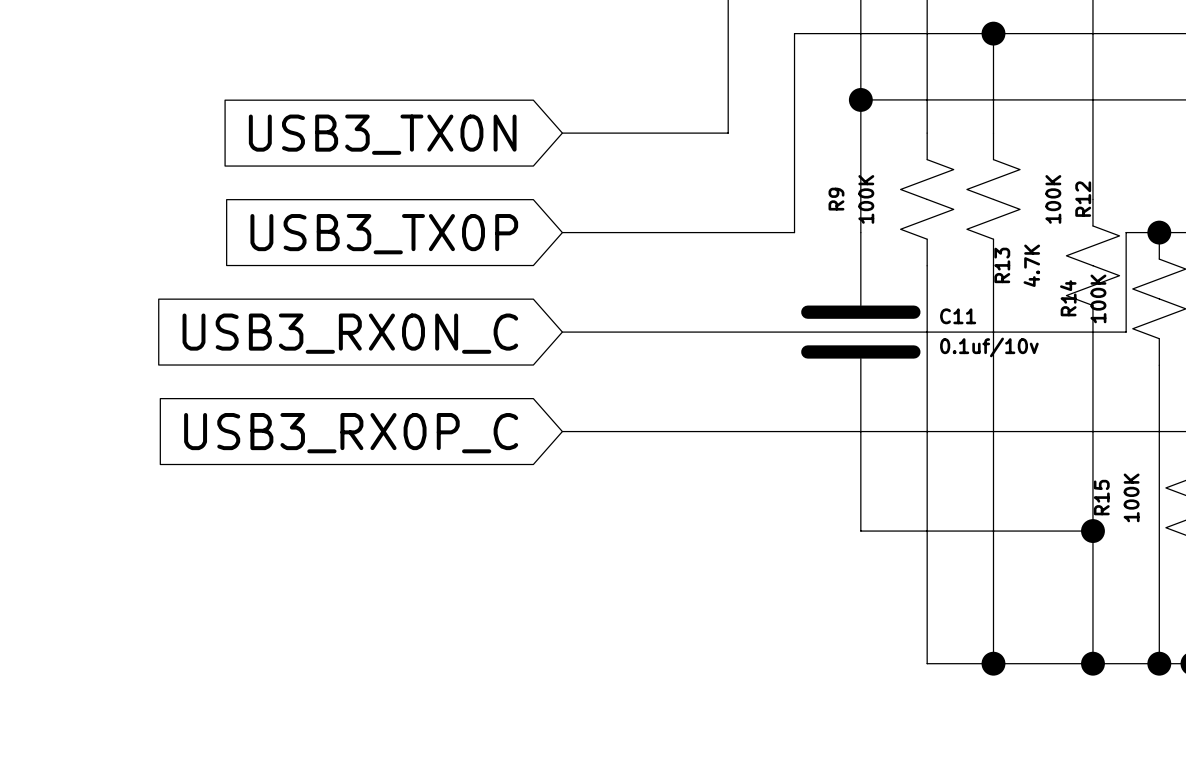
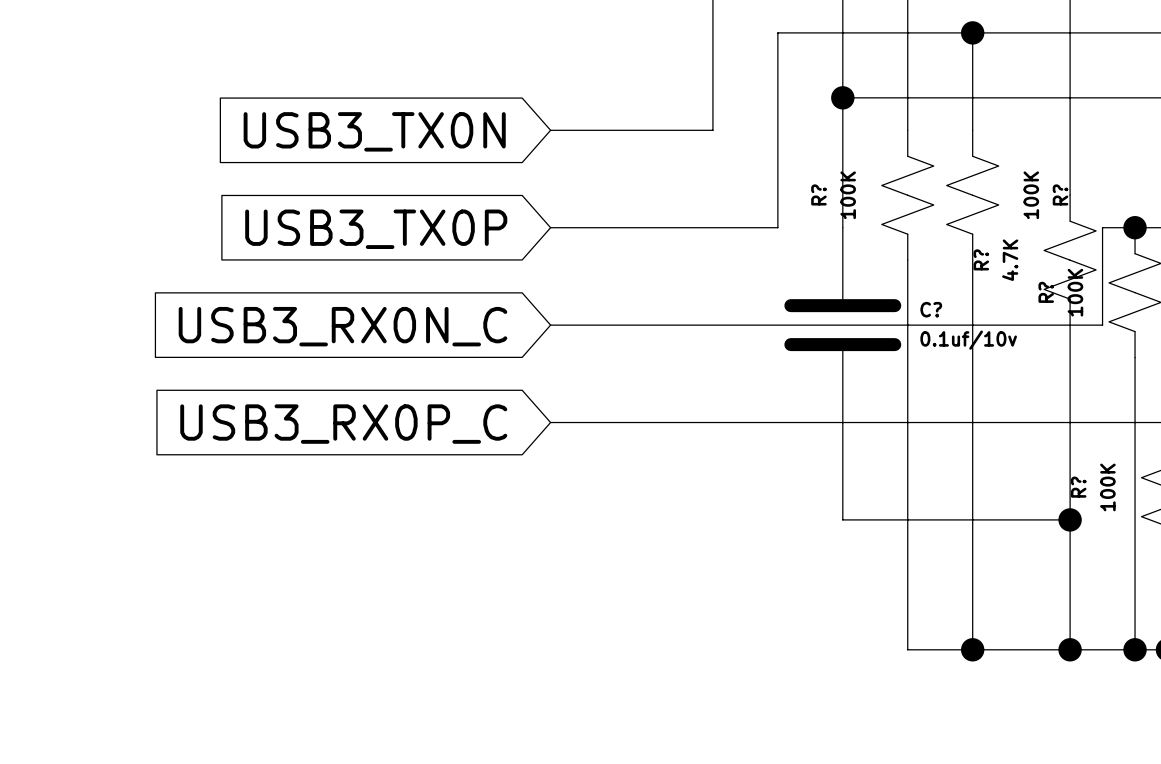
R9 name: R9 (836, 199) -> R? (818, 194)
R12 name: R12 (1083, 199) -> R? (1060, 194)
R13 name: R13 (1002, 265) -> R? (981, 259)
R14 name: R14 (1068, 298) -> R? (1046, 292)
C11 name: C11 (958, 316) -> C? (931, 309)
R15 name: R15 (1101, 497) -> R? (1078, 487)

